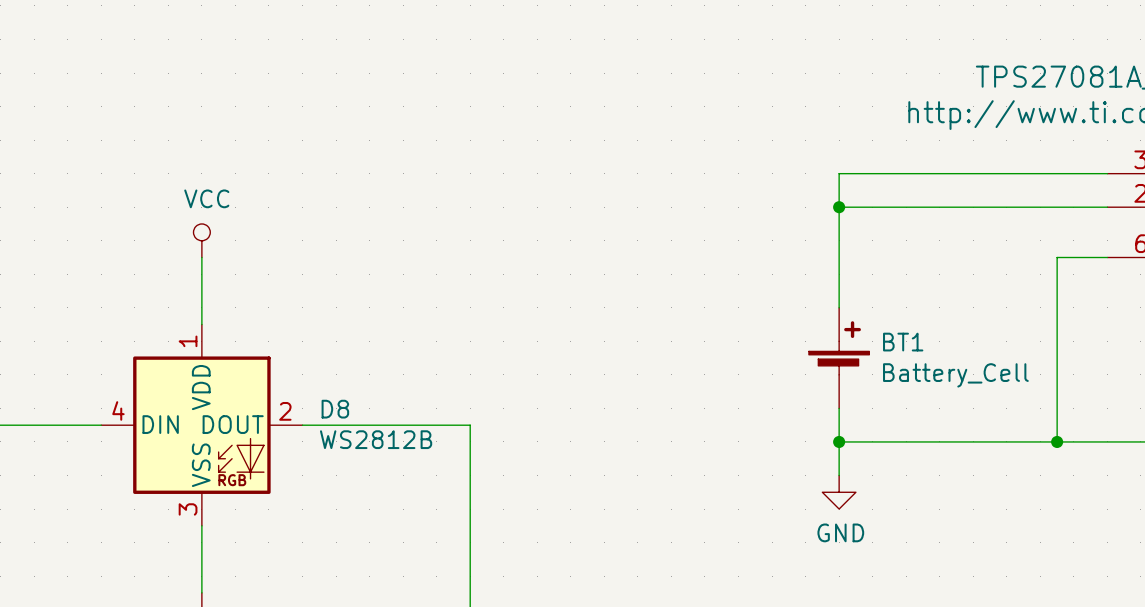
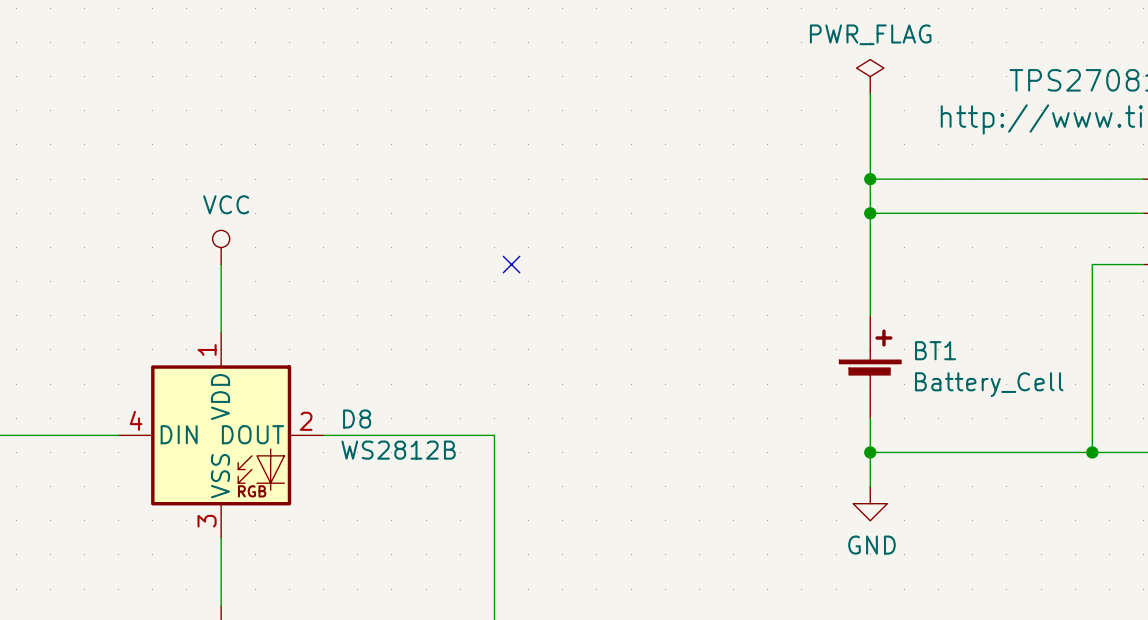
power symbol: none -> PWR_FLAG (870, 76)
wire: none -> (870, 93) (870, 179)
junction: none -> (870, 179)
no-connect mark: none -> (511, 264)

